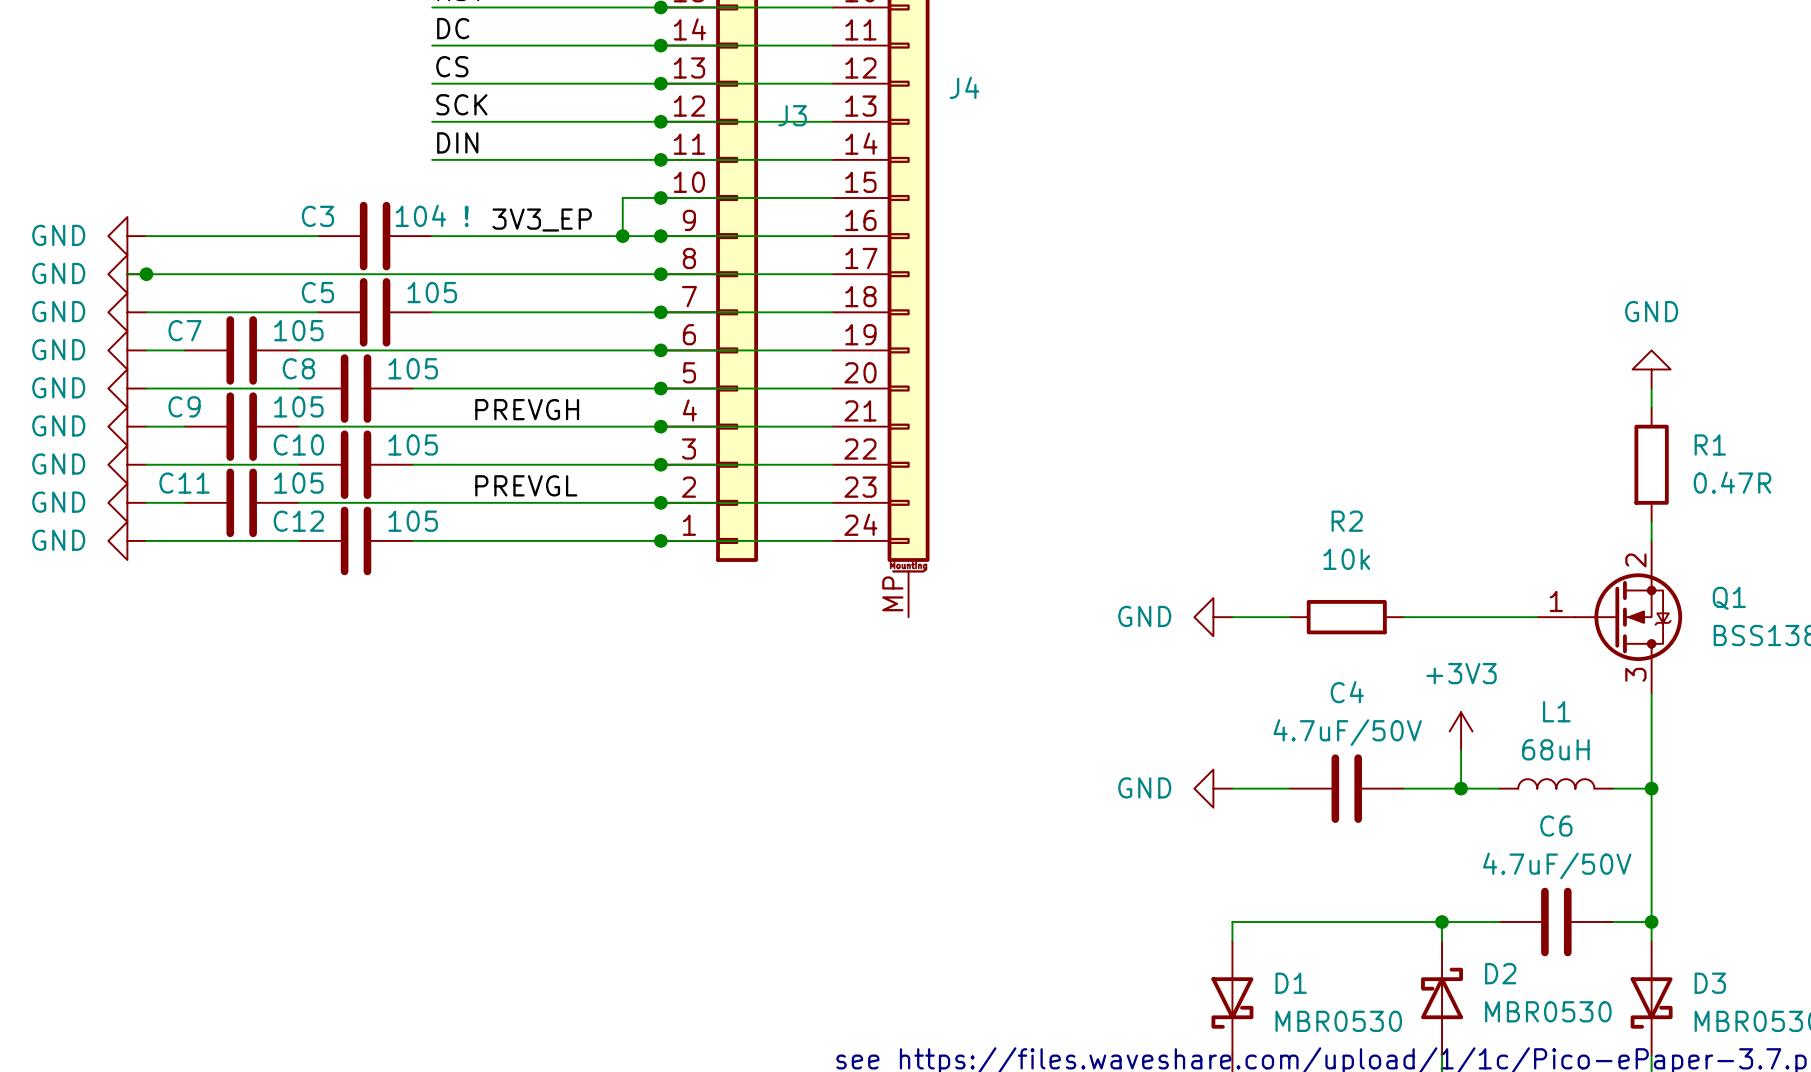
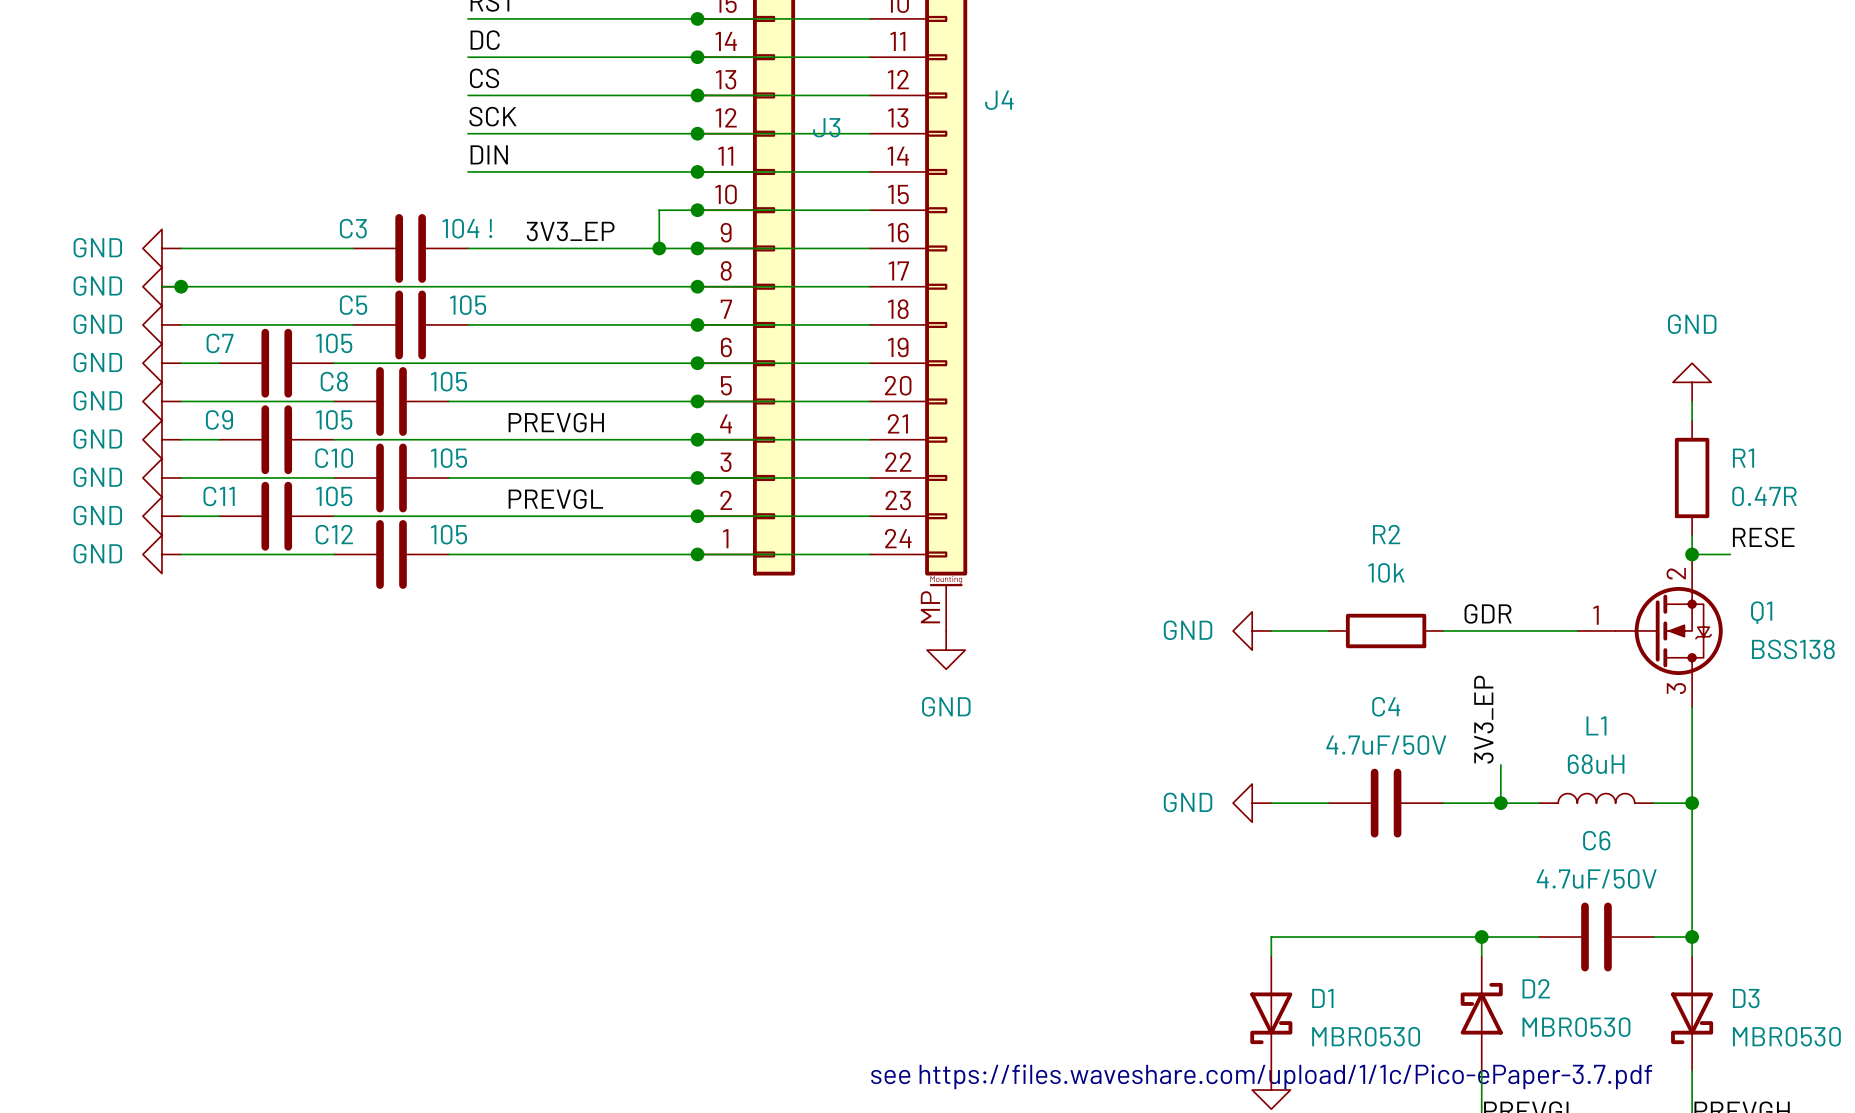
label: none -> RESE (1763, 537)
wire: none -> (1692, 554) (1730, 554)
junction: none -> (1692, 554)
label: none -> GDR (1488, 613)
power symbol: none -> GND (946, 650)
label: none -> 3V3_EP (1483, 719)
power symbol: +3V3 (1461, 731) -> none

